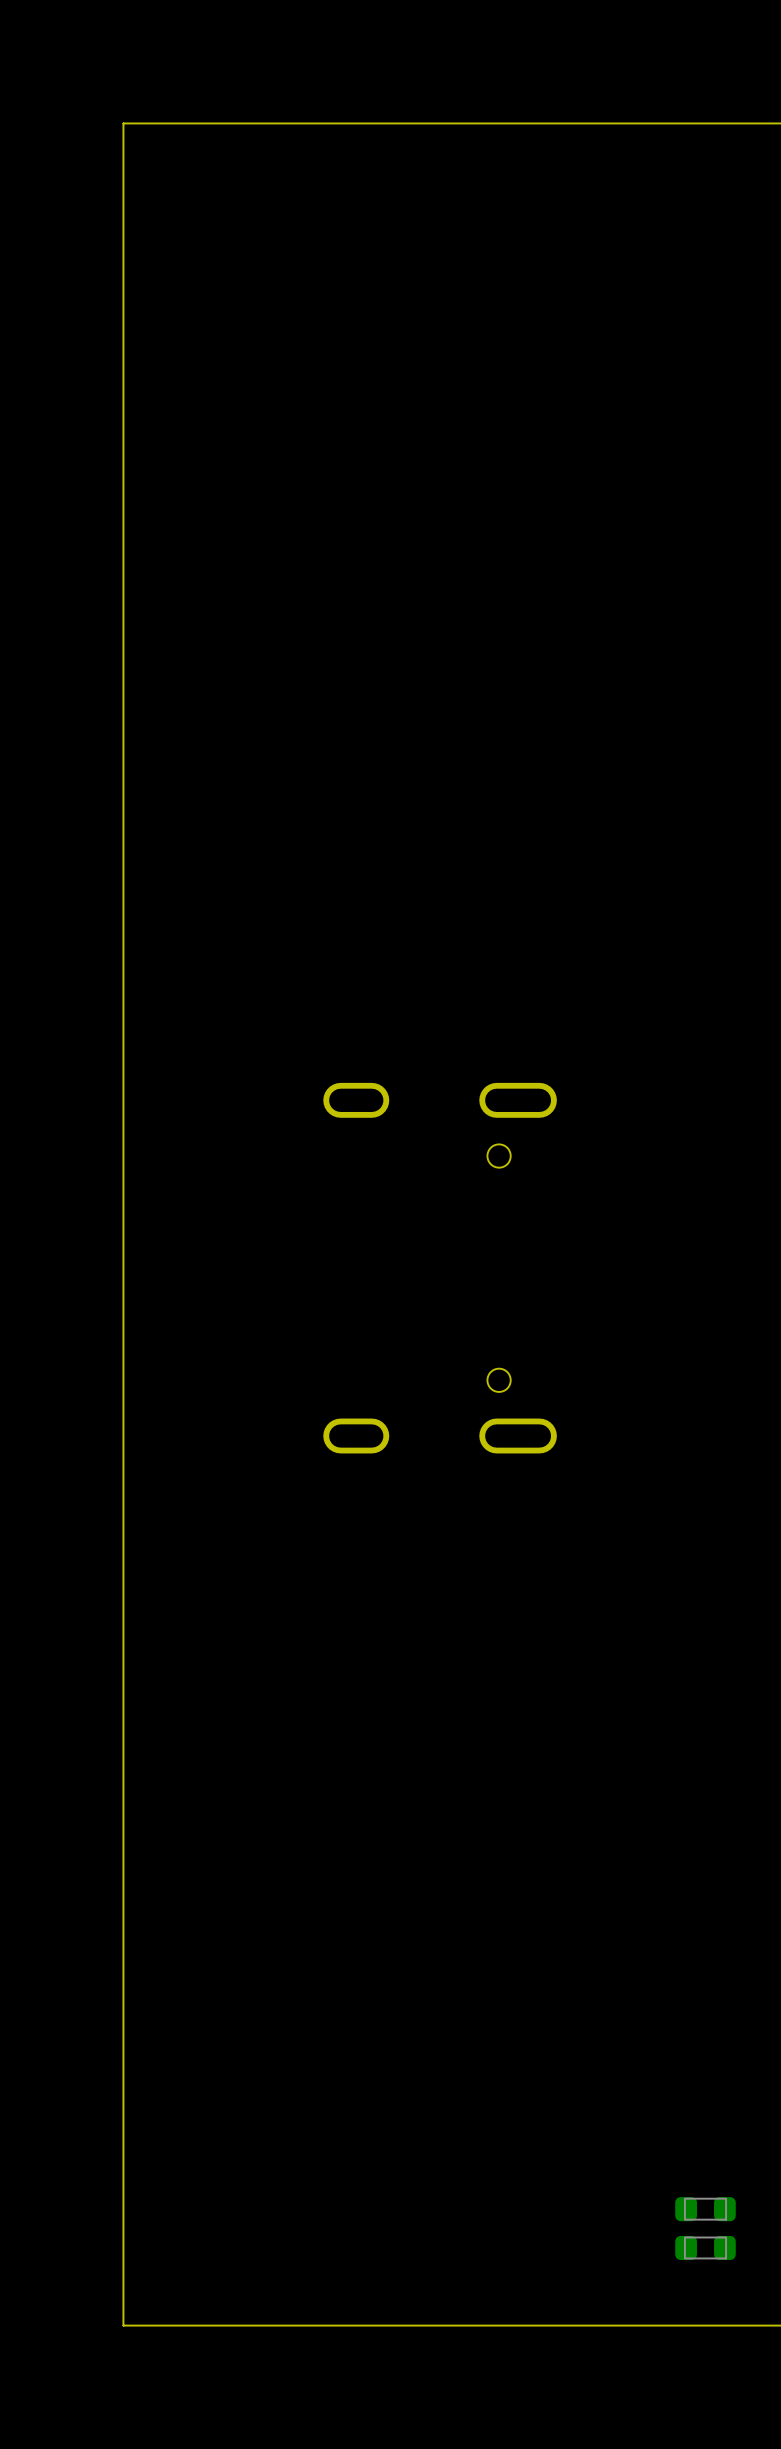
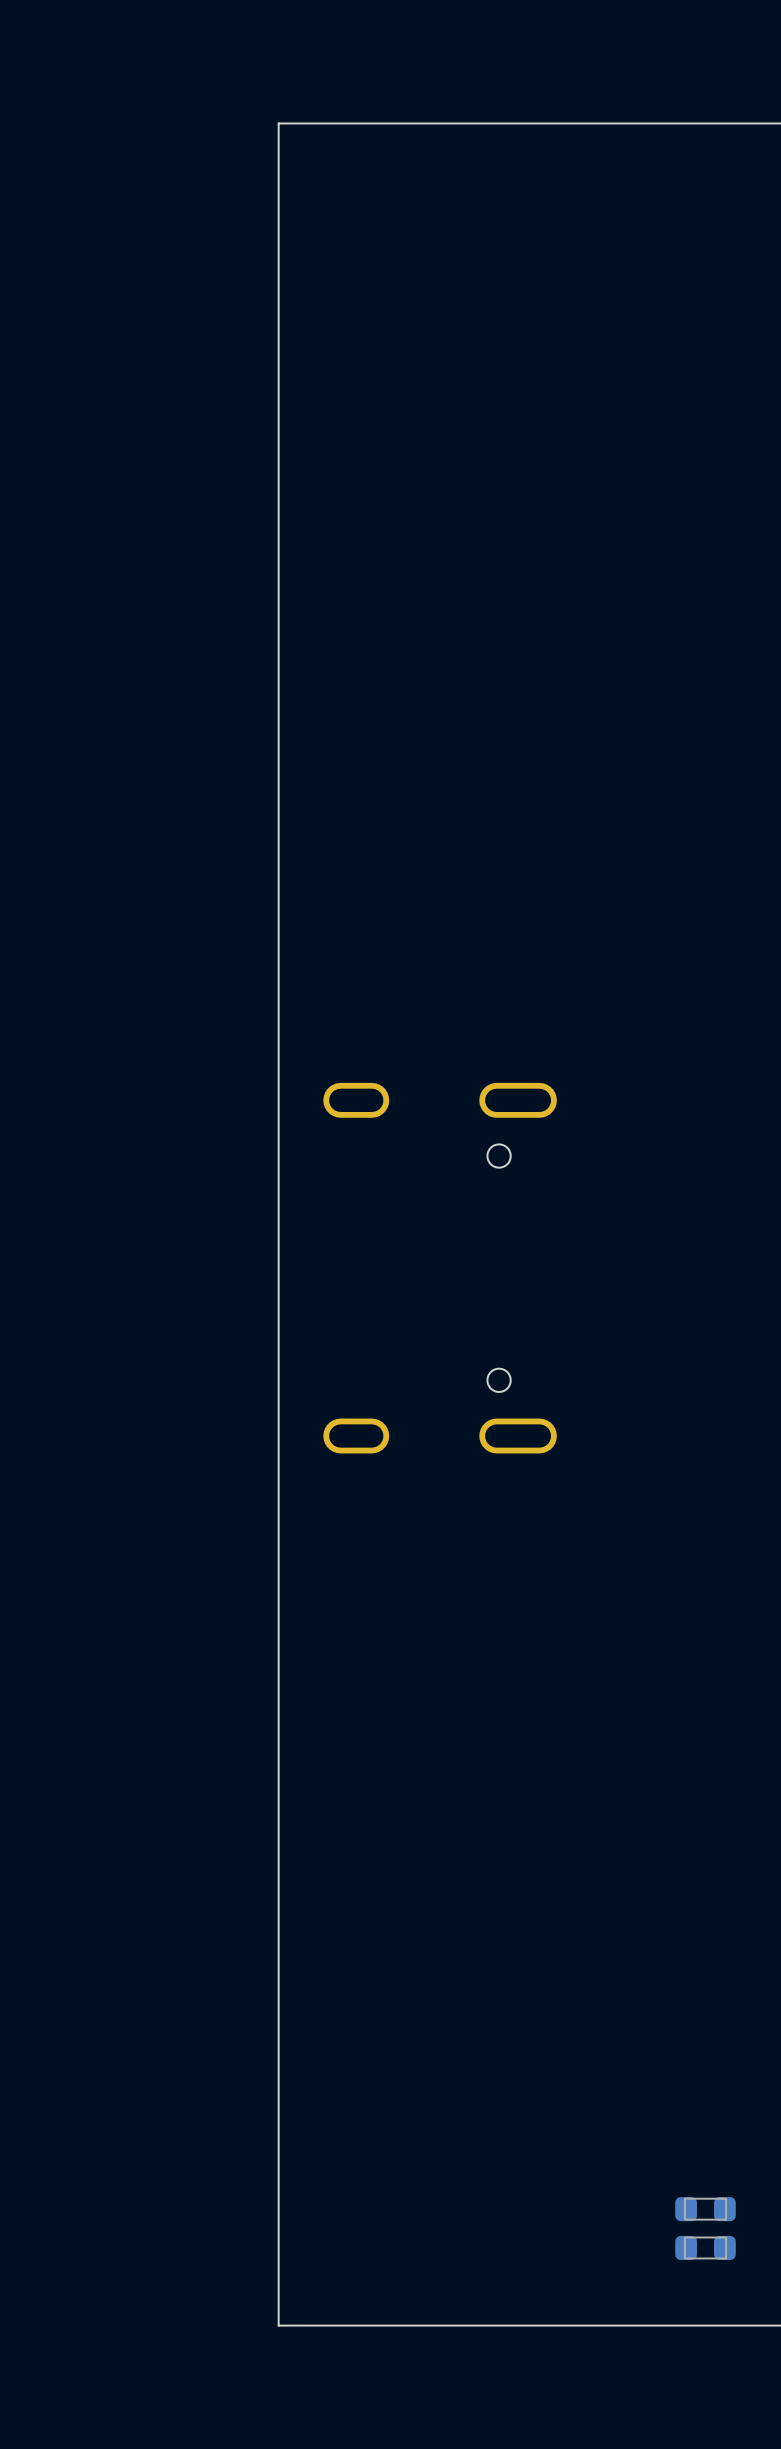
board edge: (278, 123) (123, 123) (123, 2325) (278, 2325) -> (278, 123) (278, 2325)

